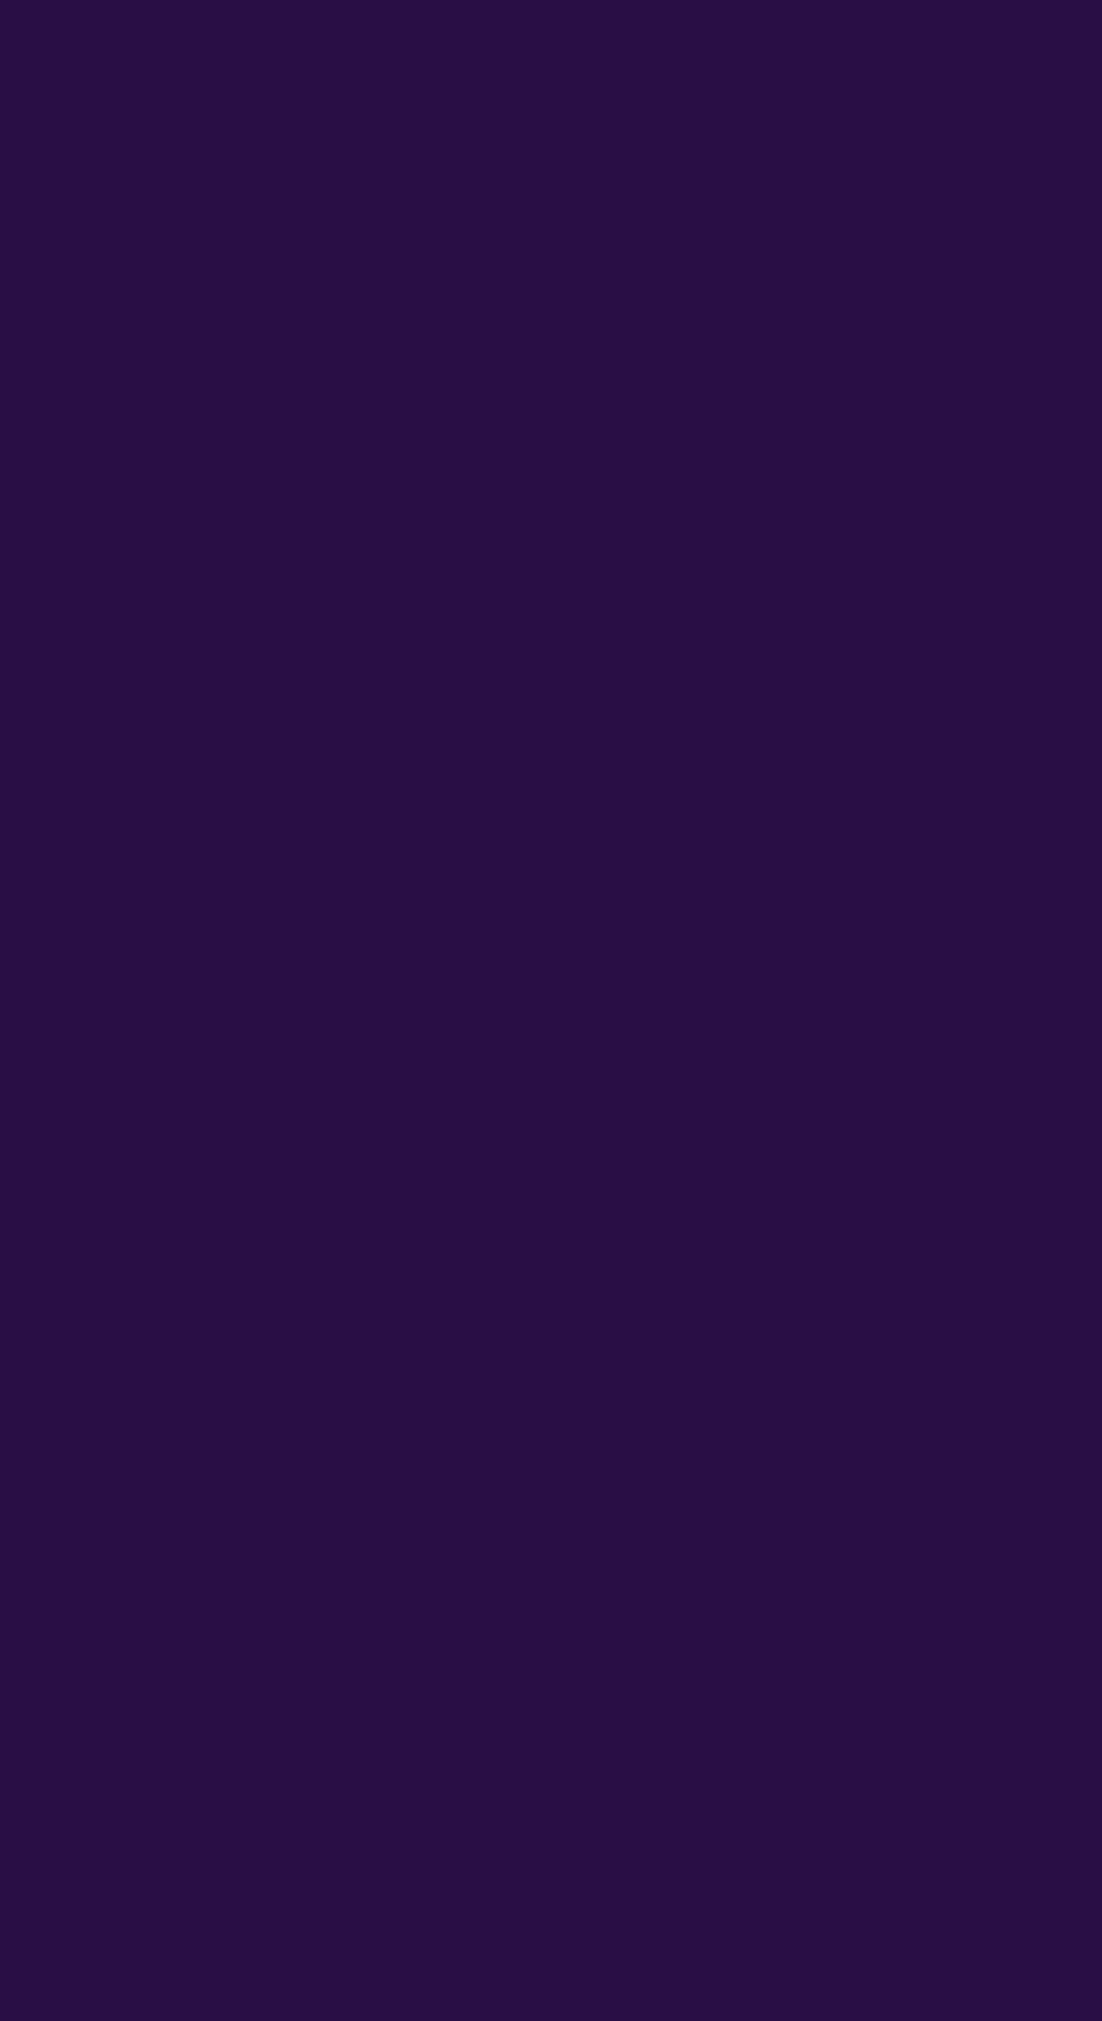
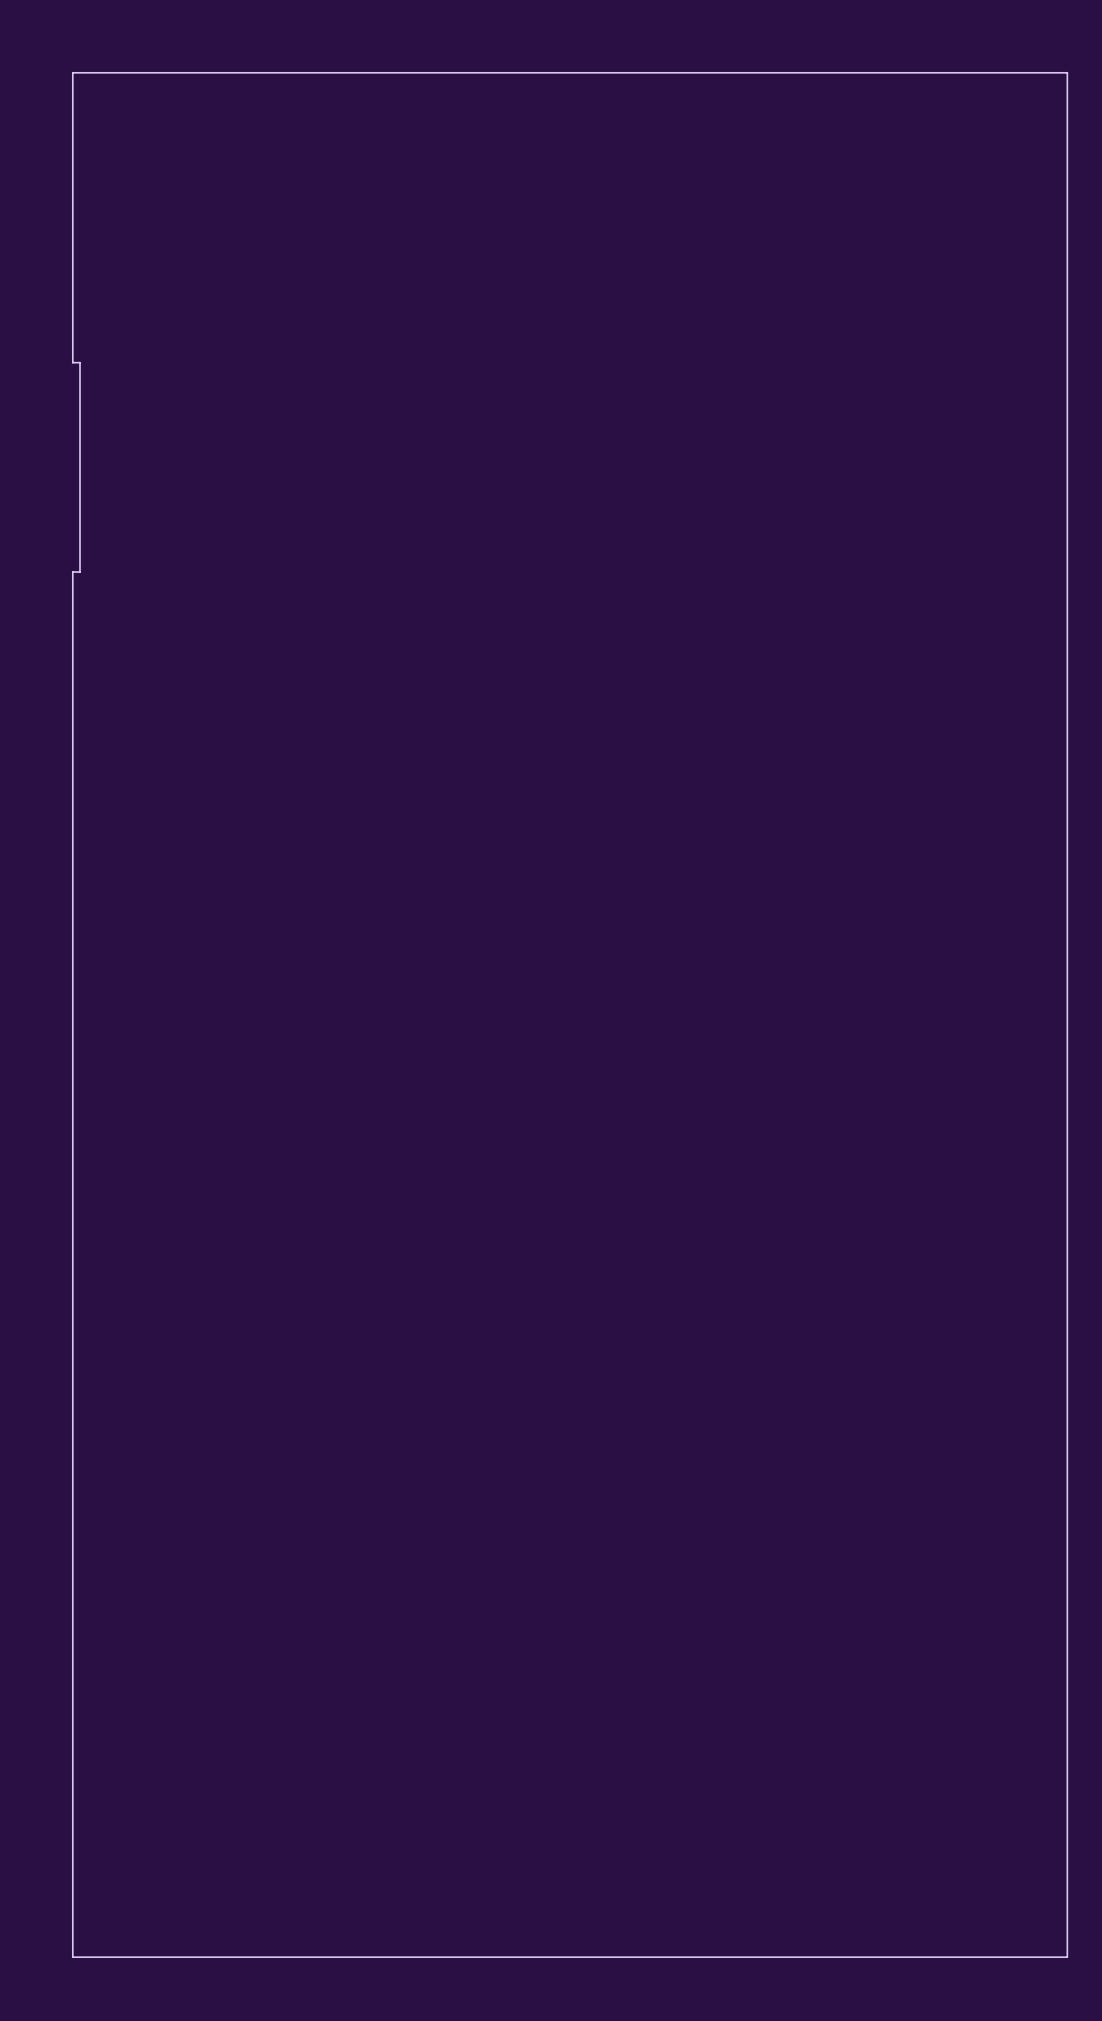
board edge: none -> (72, 72) (1067, 72) (1067, 1957) (72, 1957) (72, 572) (80, 572) (80, 362) (72, 362) (72, 72)

